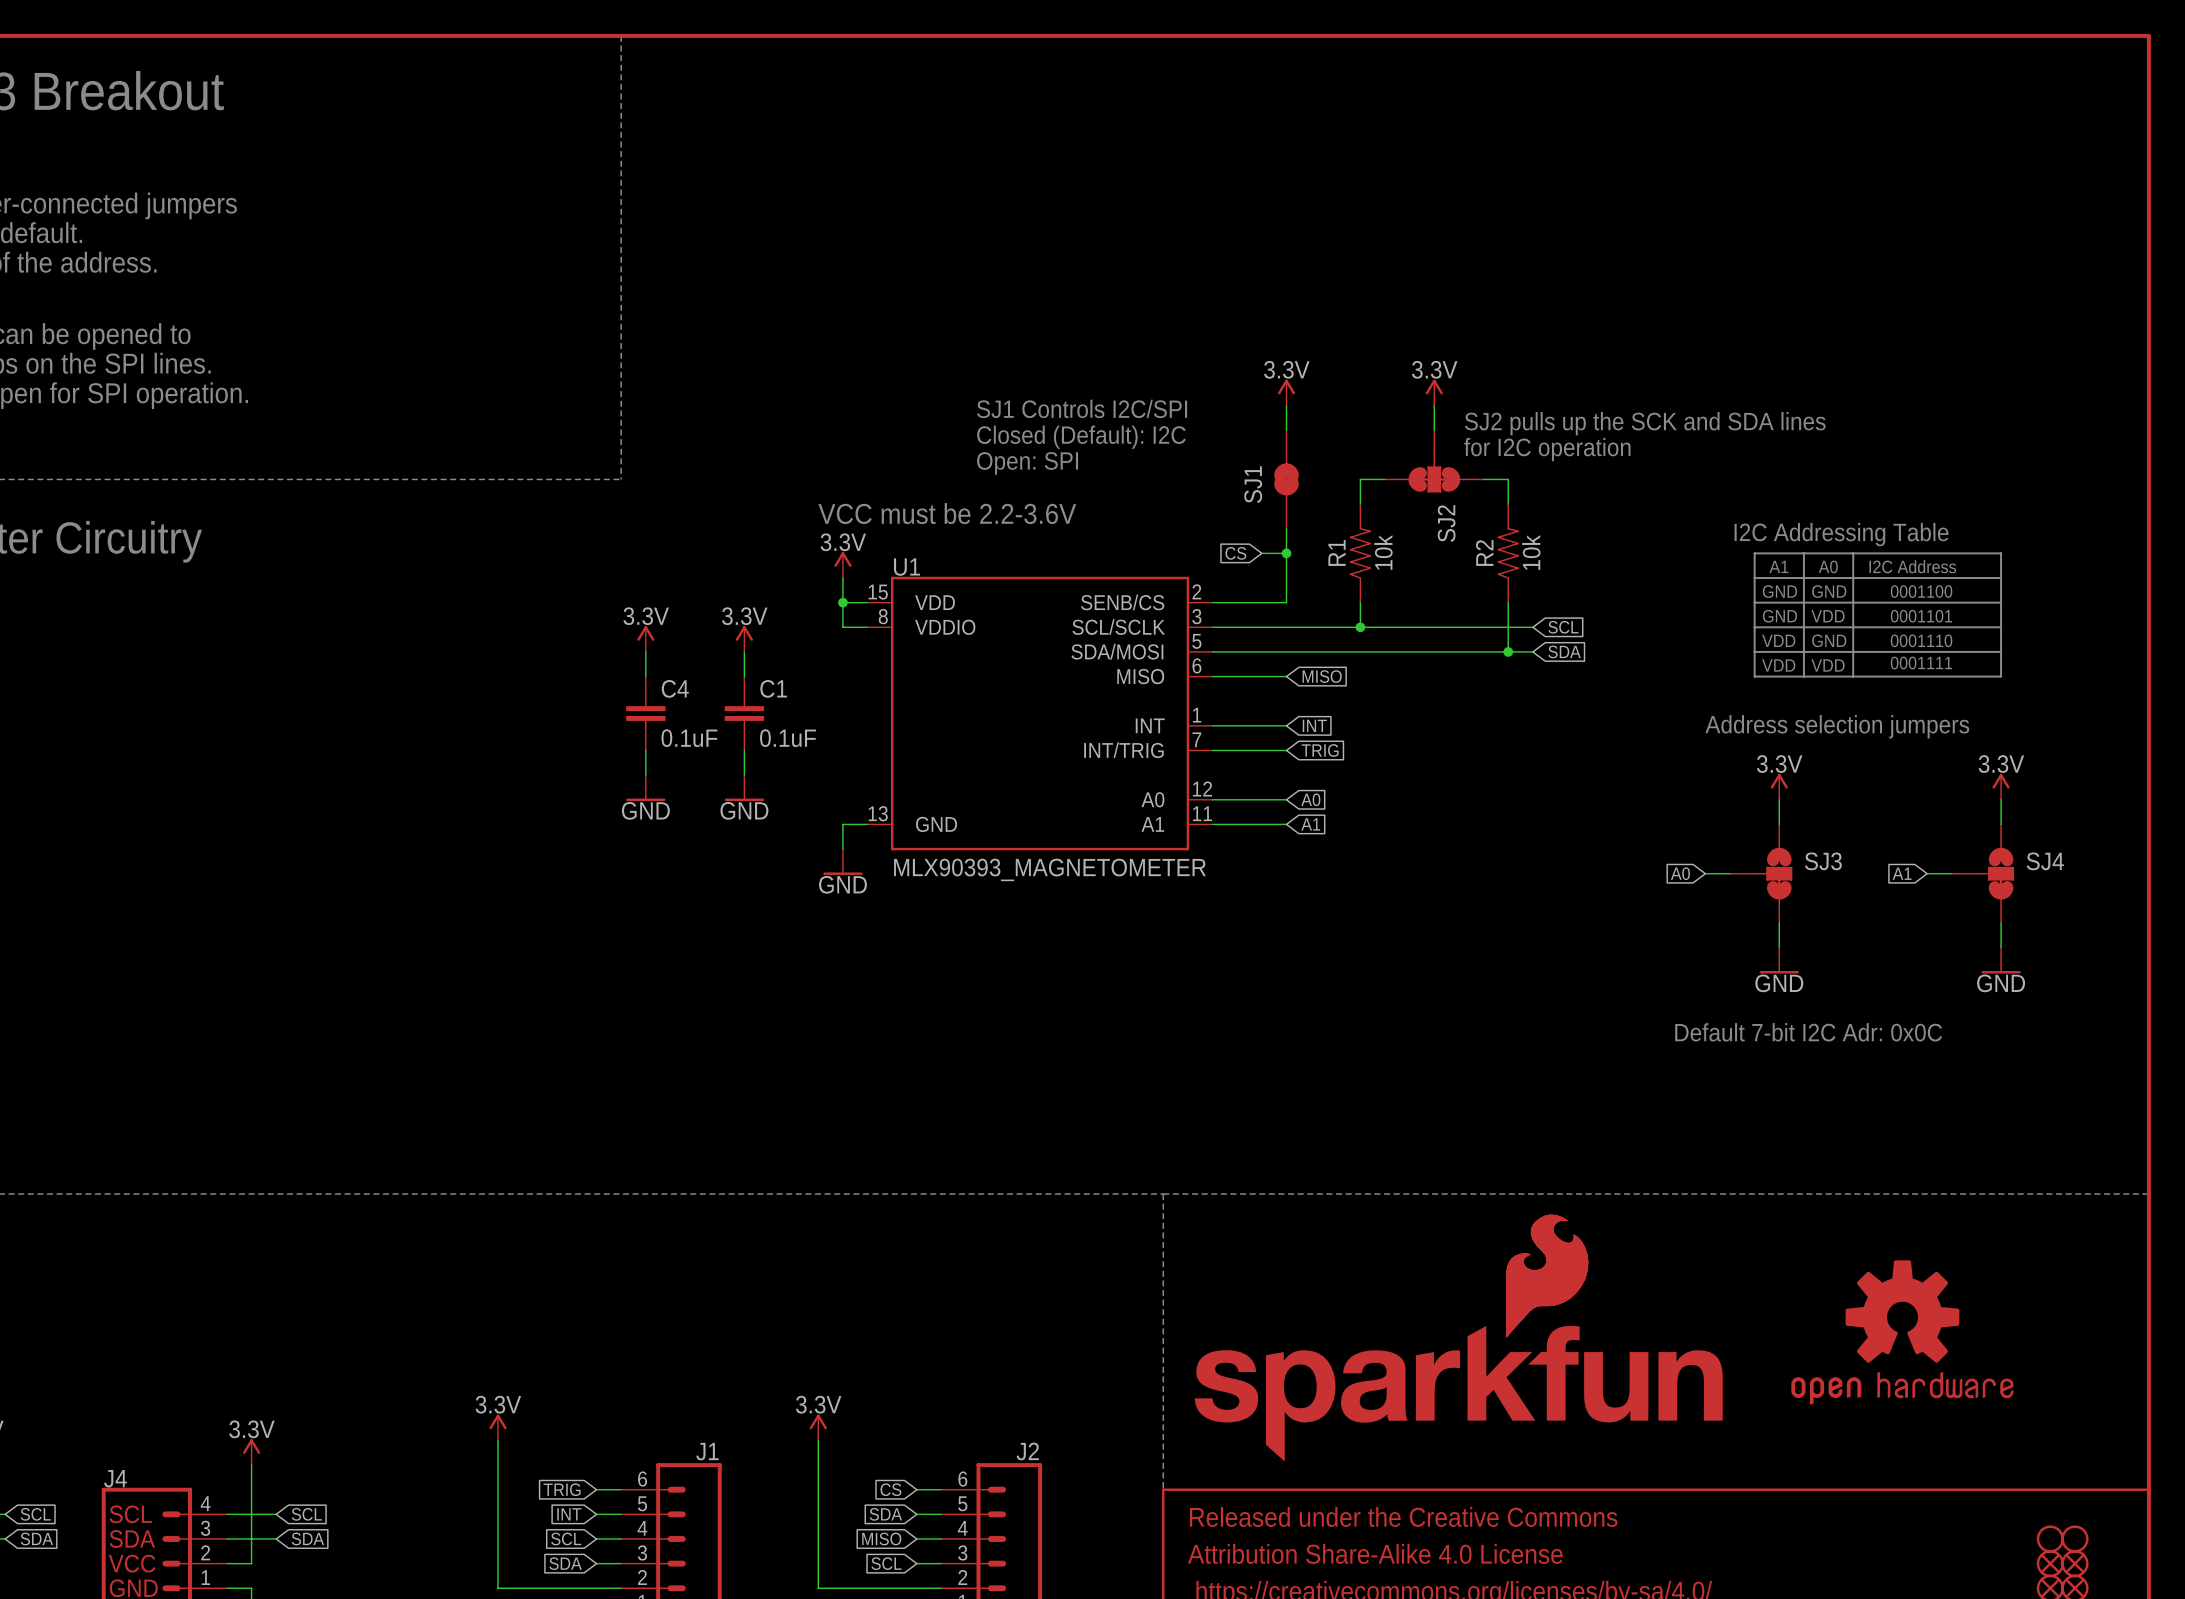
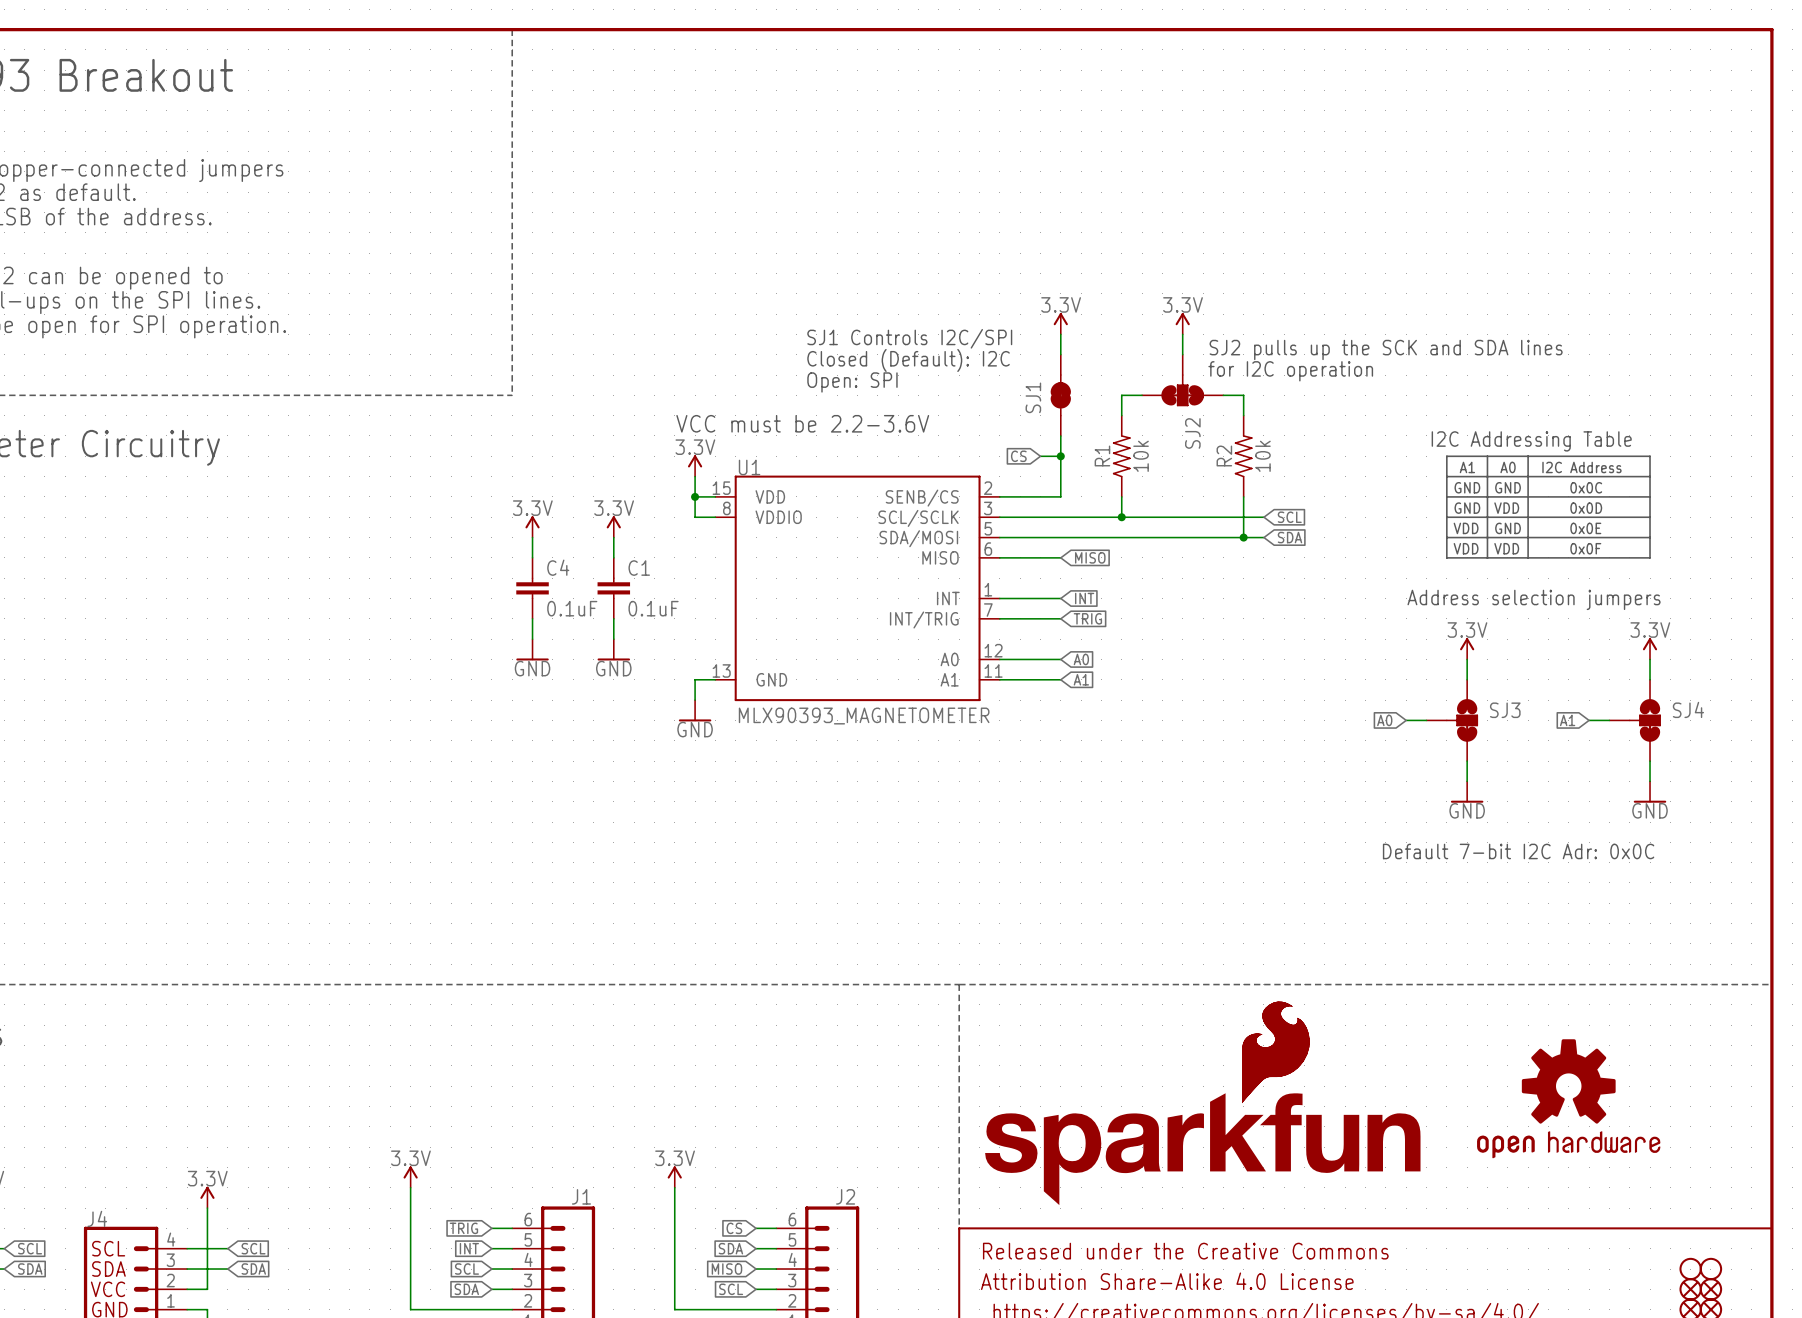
text: 0001100 (1921, 591) -> none
text: none -> 0x0C (1586, 487)
text: 0001101 (1921, 616) -> none
text: none -> 0x0D (1586, 508)
text: none -> 0x0E (1585, 528)
text: 0001110 (1921, 640) -> none
text: 0001111 (1921, 663) -> none
text: none -> 0x0F (1585, 548)

